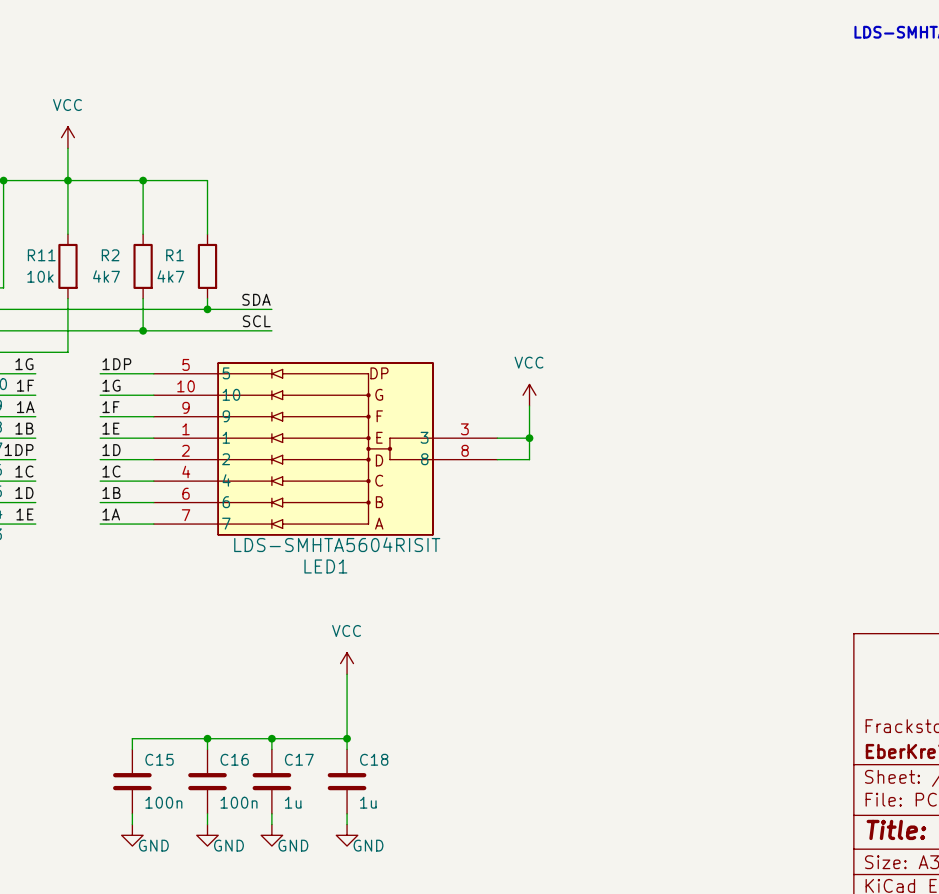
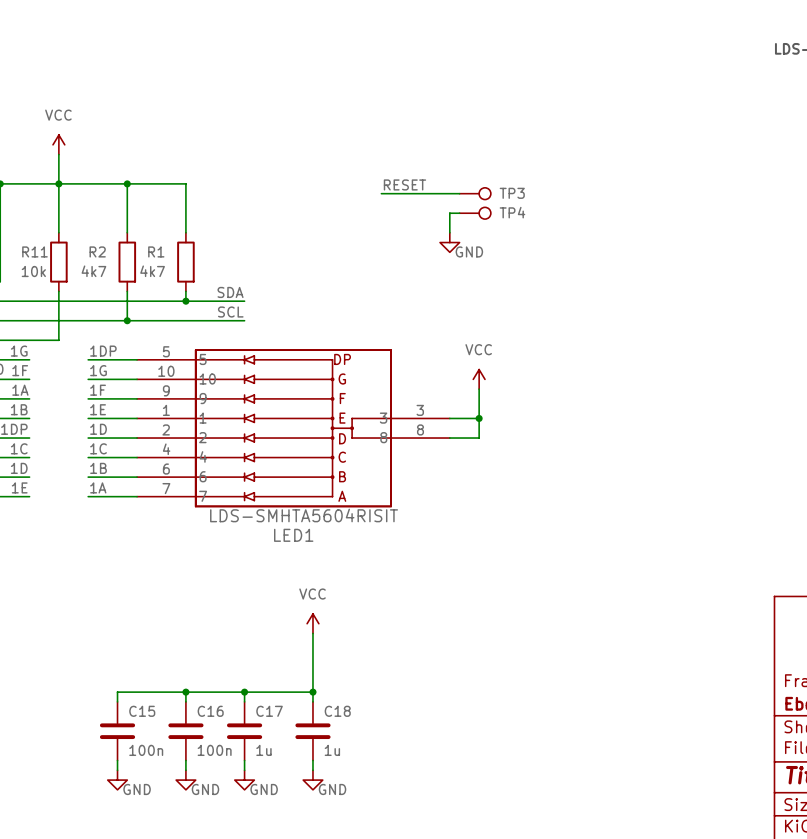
label: none -> RESET (404, 184)
wire: none -> (381, 193) (459, 193)
TP3: none -> (475, 193)
wire: none -> (459, 213) (449, 213) (449, 232)
TP4: none -> (475, 213)
power symbol: none -> GND (449, 242)

